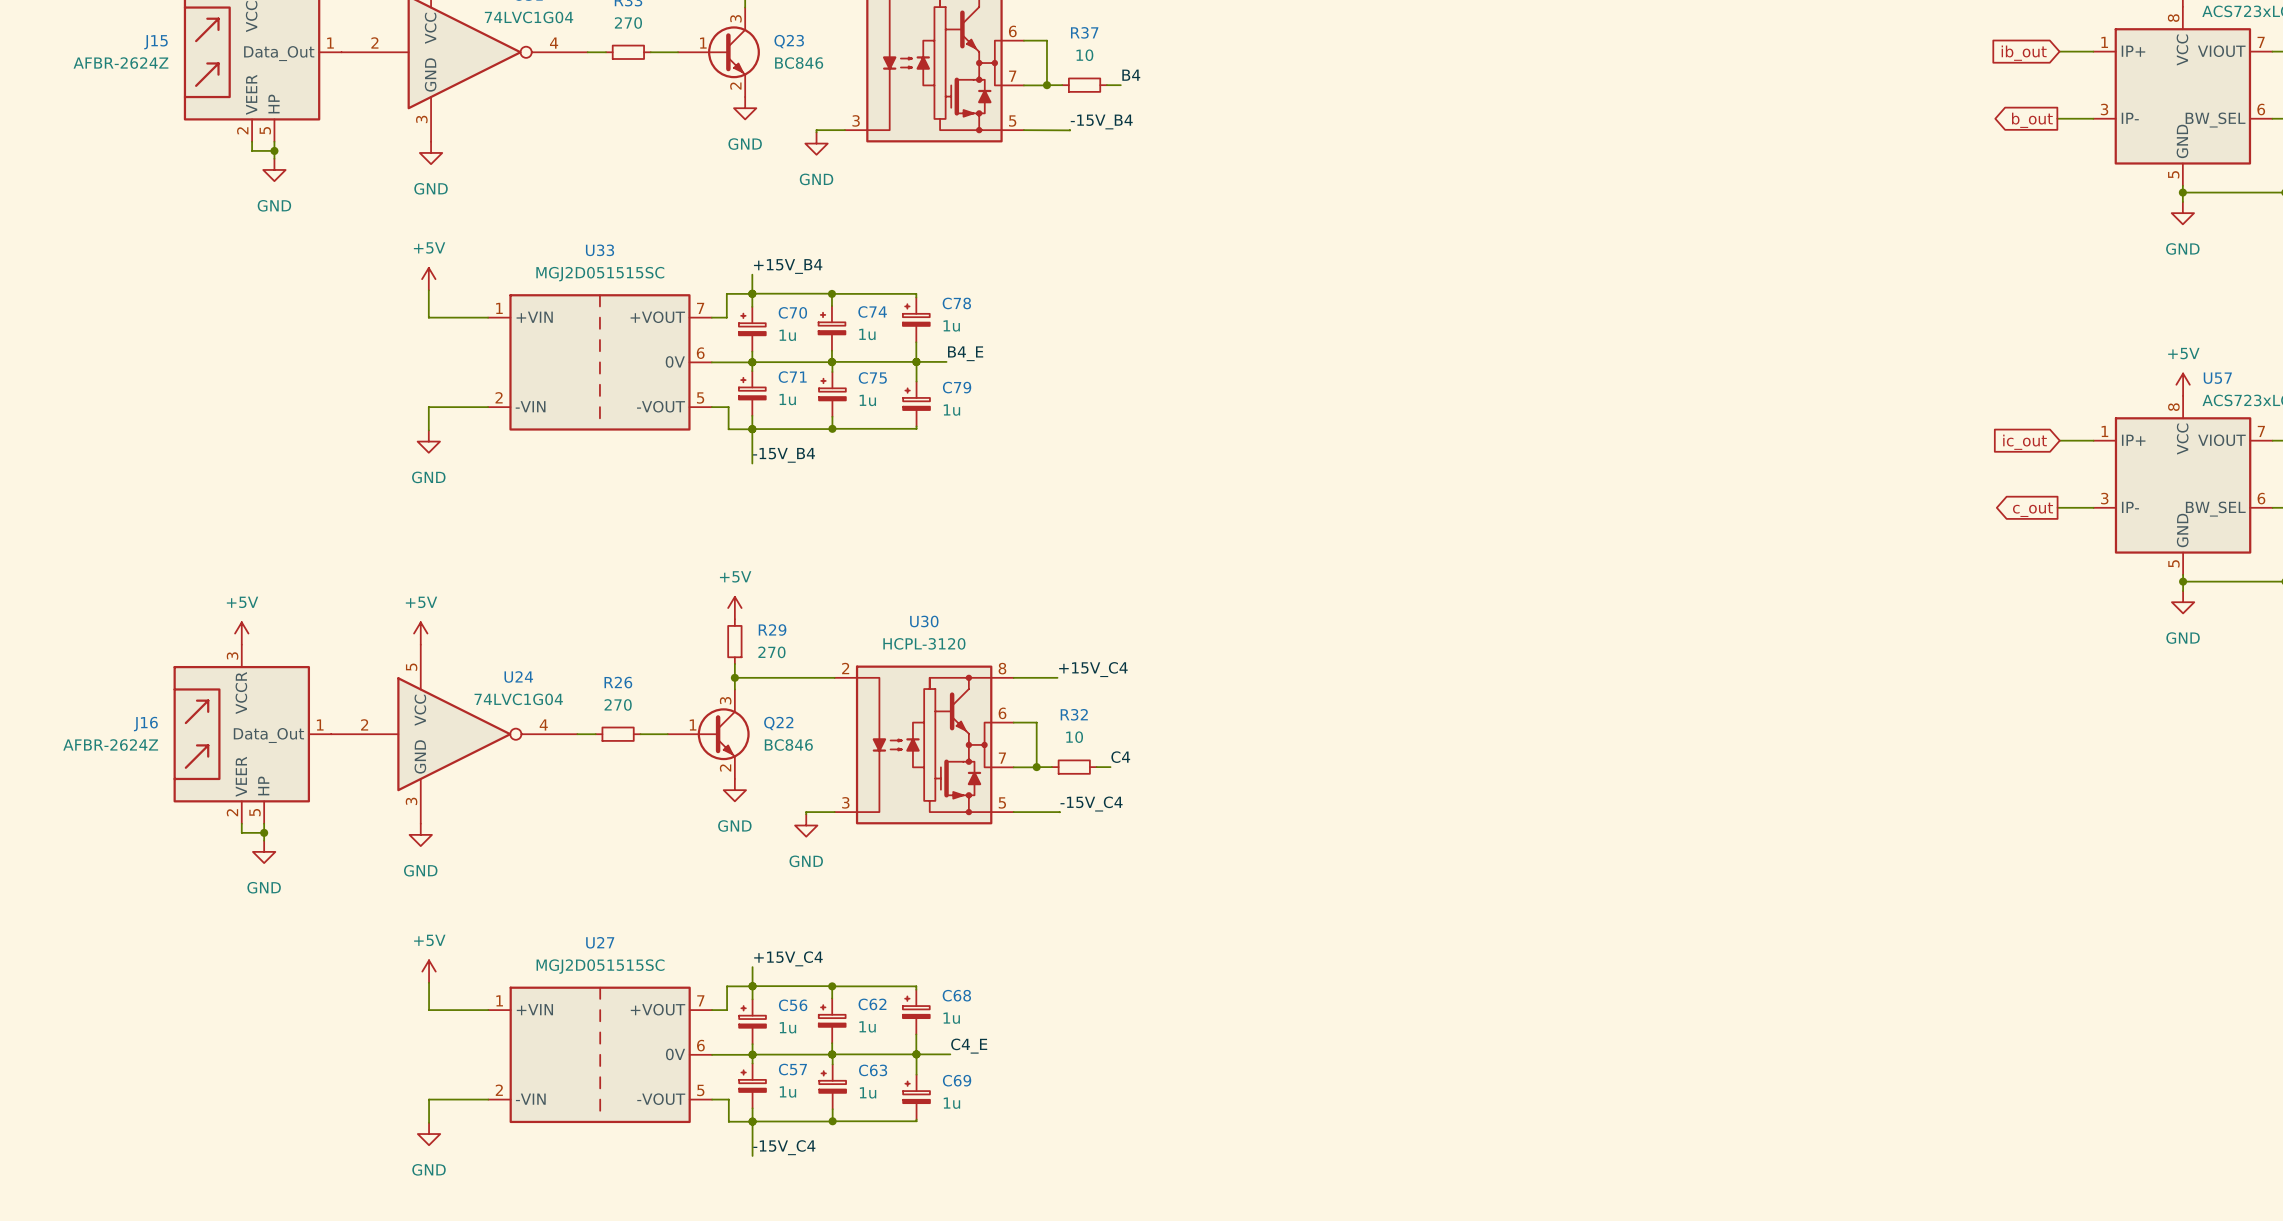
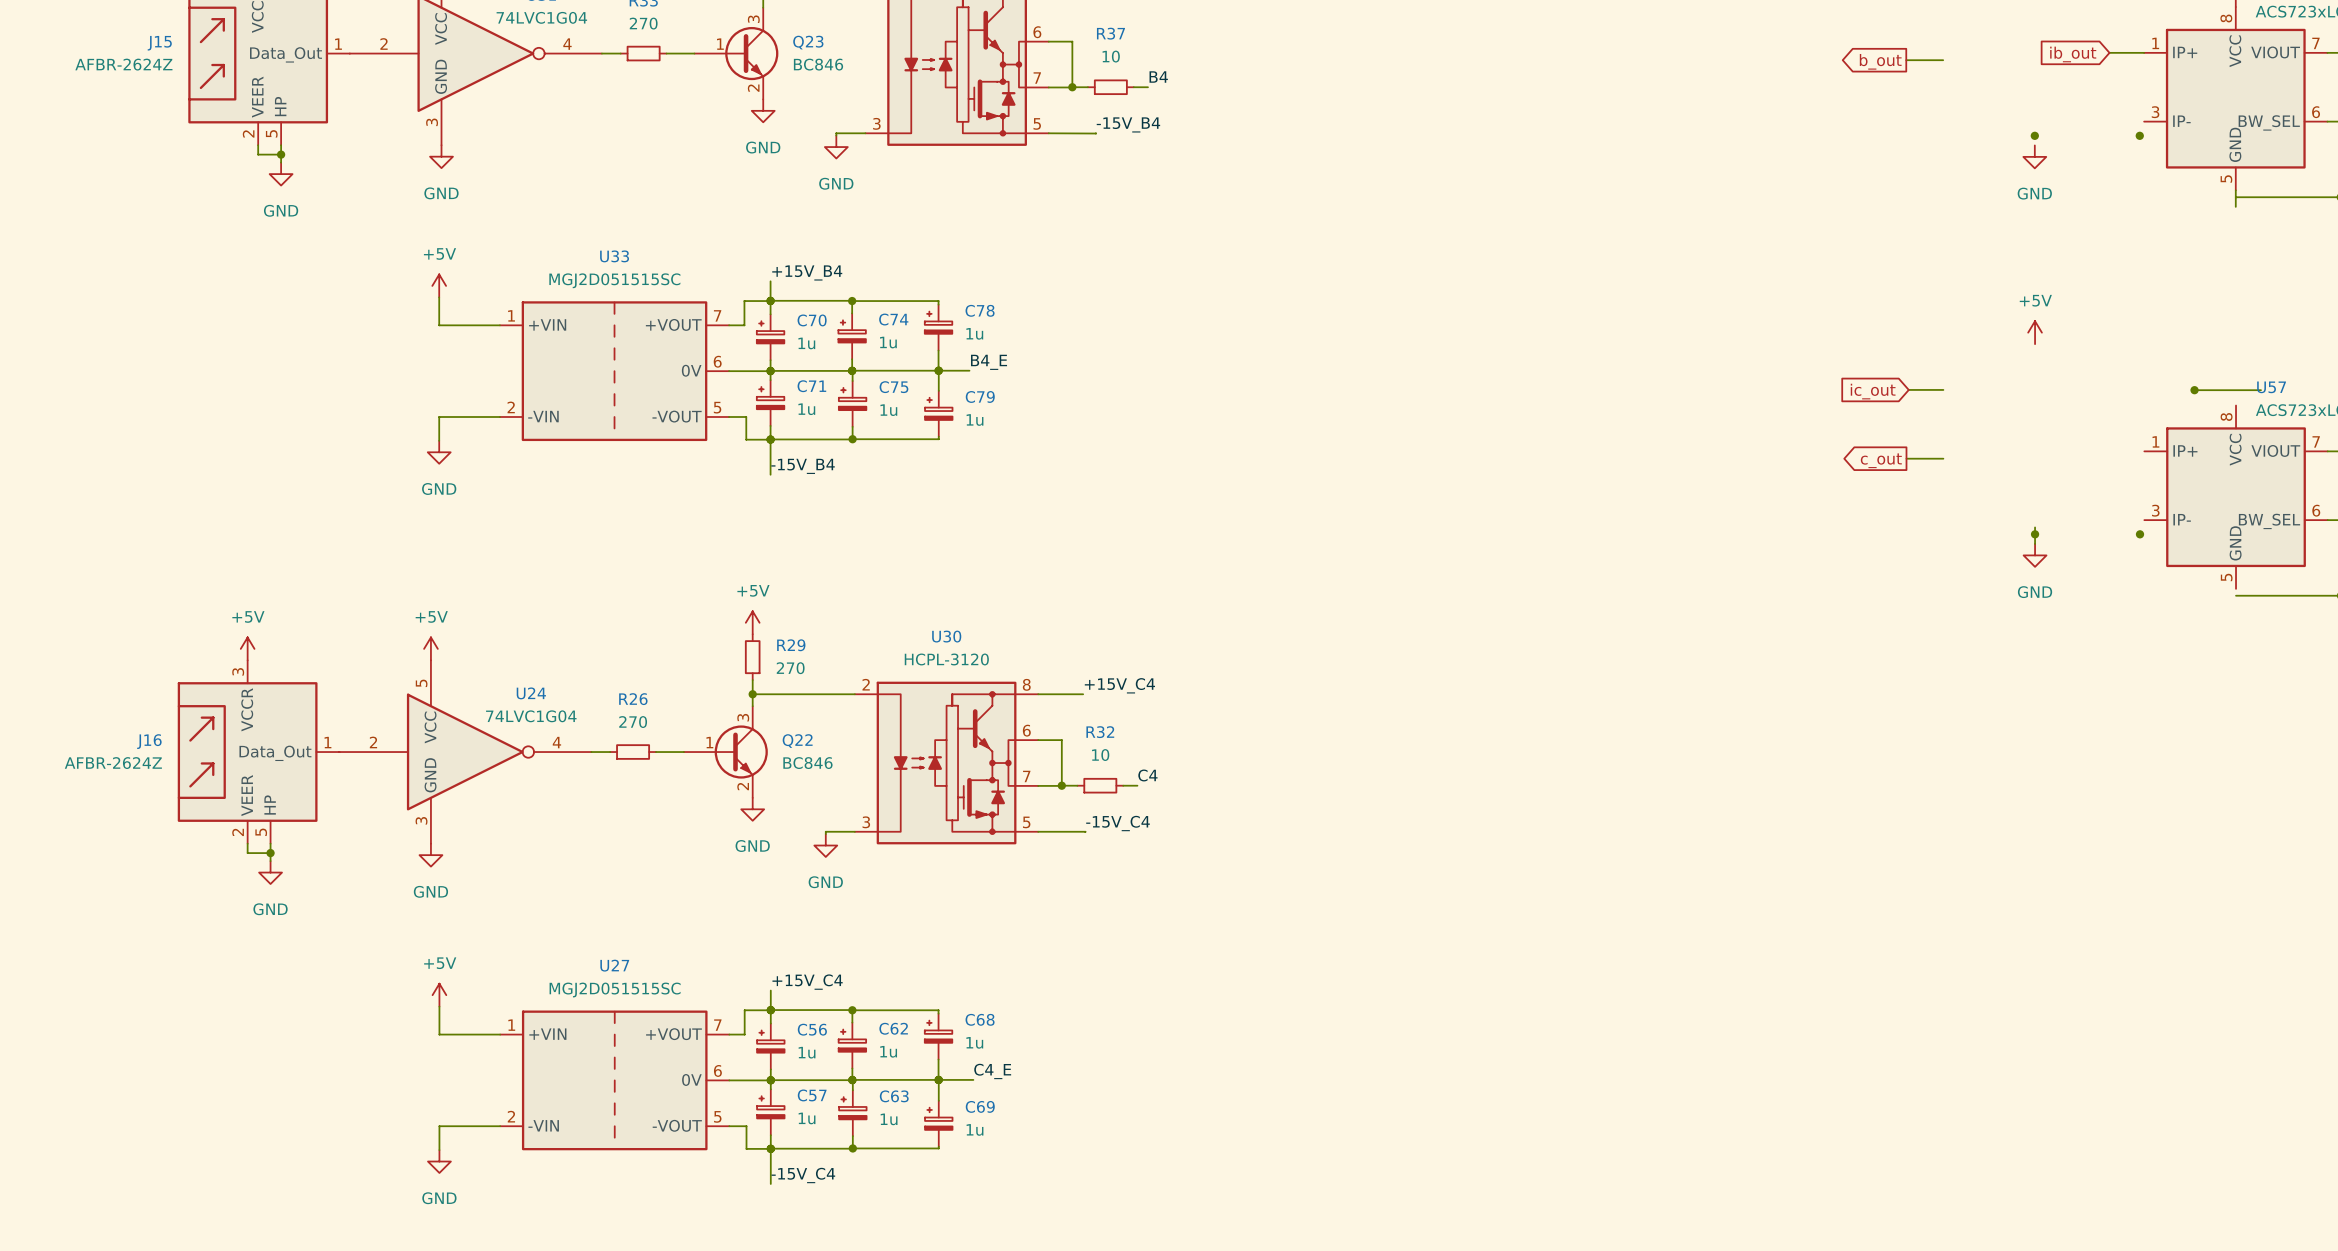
wire: (2057, 118) (2093, 118) -> (1906, 60) (1943, 60)
global label position: b_out (2032, 120) -> b_out (1880, 61)
junction: none -> (2034, 135)
junction: none -> (2139, 135)
power symbol: none -> GND (2034, 156)
junction: (2182, 192) -> none
power symbol: GND (2182, 213) -> none
wire: none -> (2194, 390) (2260, 390)
junction: none -> (2194, 390)
power symbol position: +5V (2183, 384) -> +5V (2035, 332)
wire: (2059, 440) (2093, 440) -> (1908, 389) (1943, 389)
global label position: ic_out (2025, 442) -> ic_out (1873, 391)
wire: (2057, 507) (2093, 507) -> (1906, 458) (1943, 458)
global label position: c_out (2033, 509) -> c_out (1881, 460)
junction: none -> (2035, 534)
junction: none -> (2140, 534)
power symbol: none -> GND (2035, 555)
wire: (2183, 574) (2183, 591) -> (2035, 527) (2035, 543)
junction: (2183, 581) -> none
power symbol: GND (2183, 602) -> none

